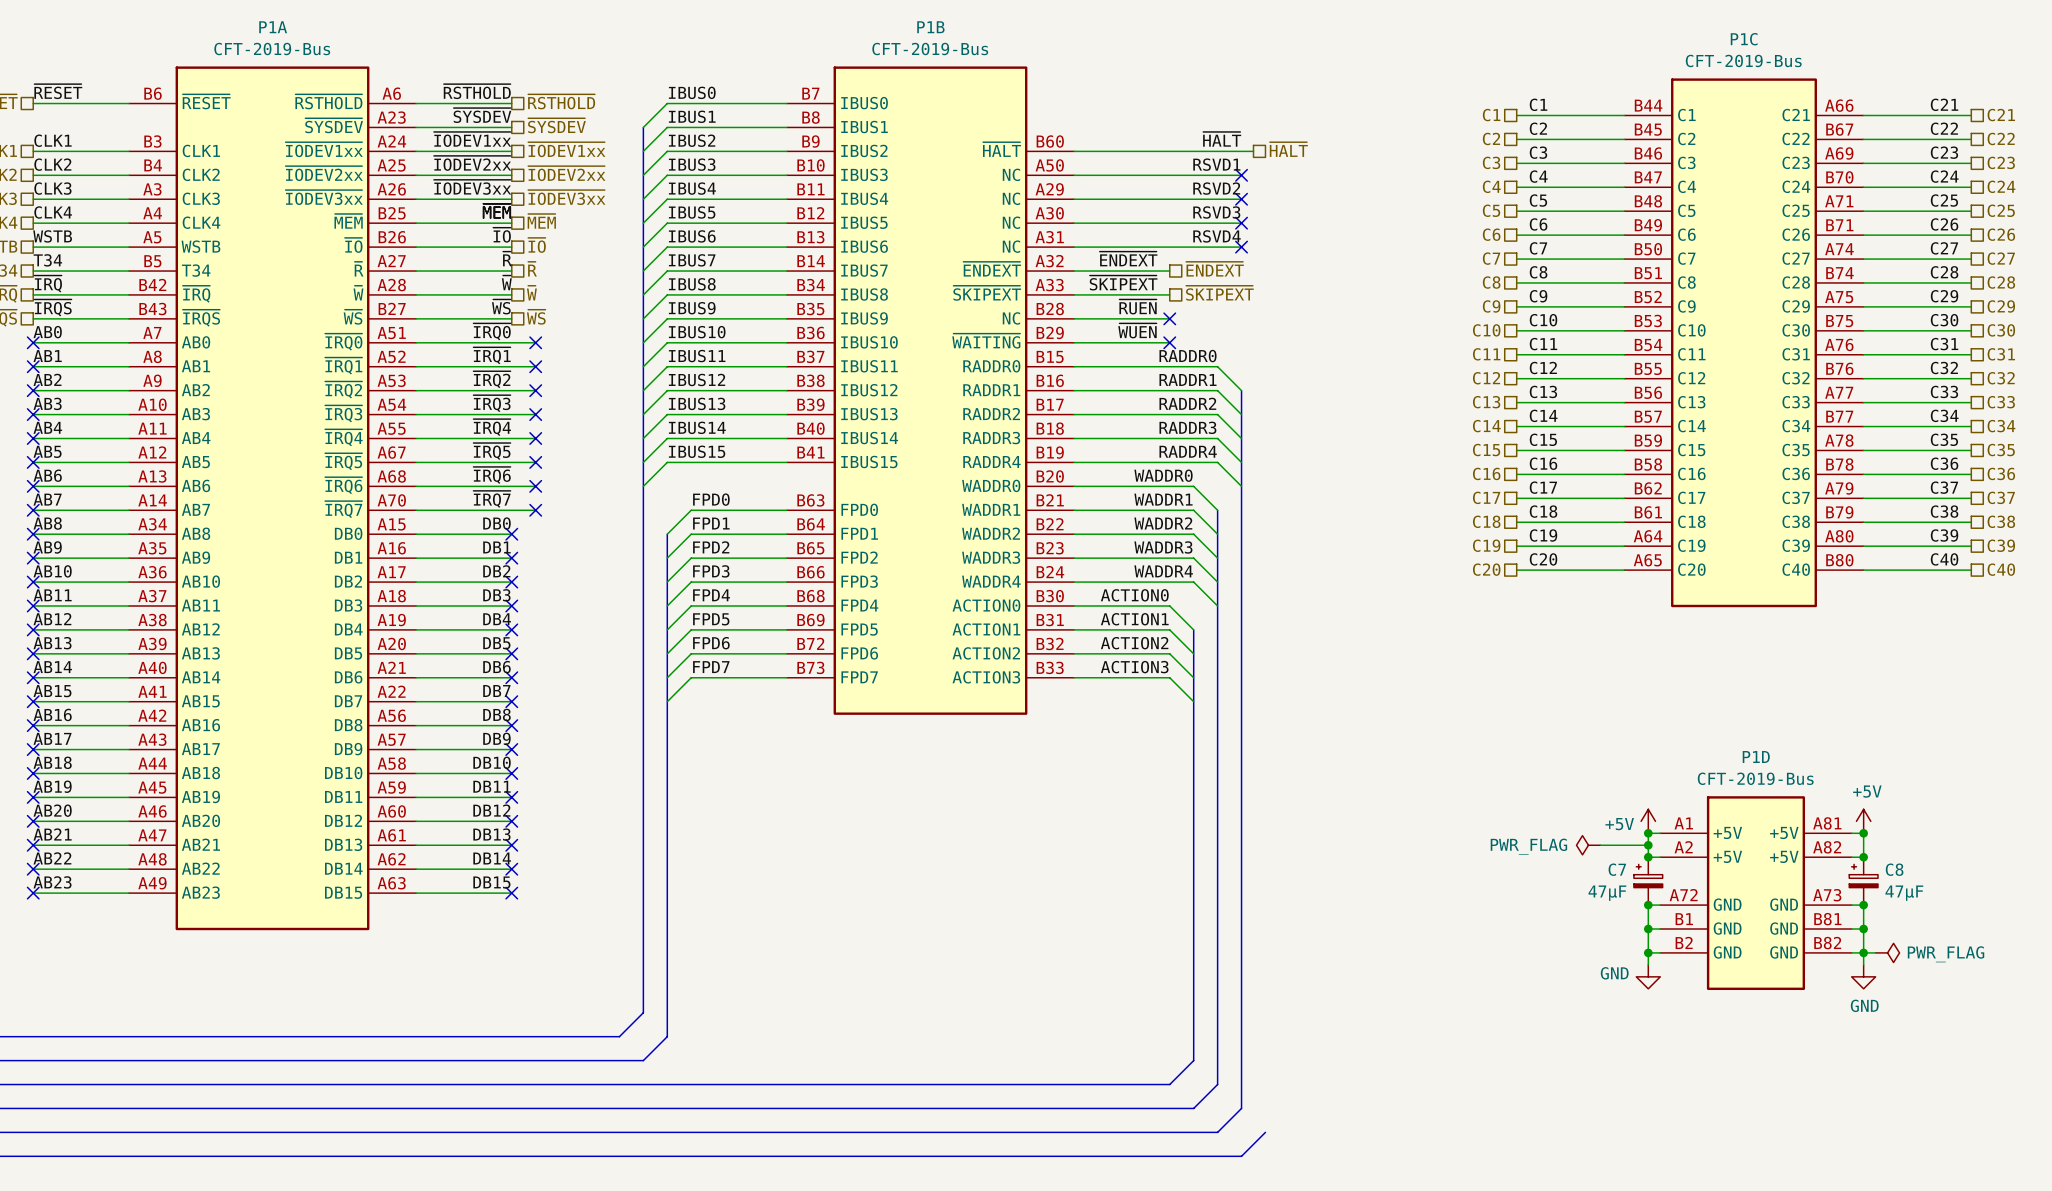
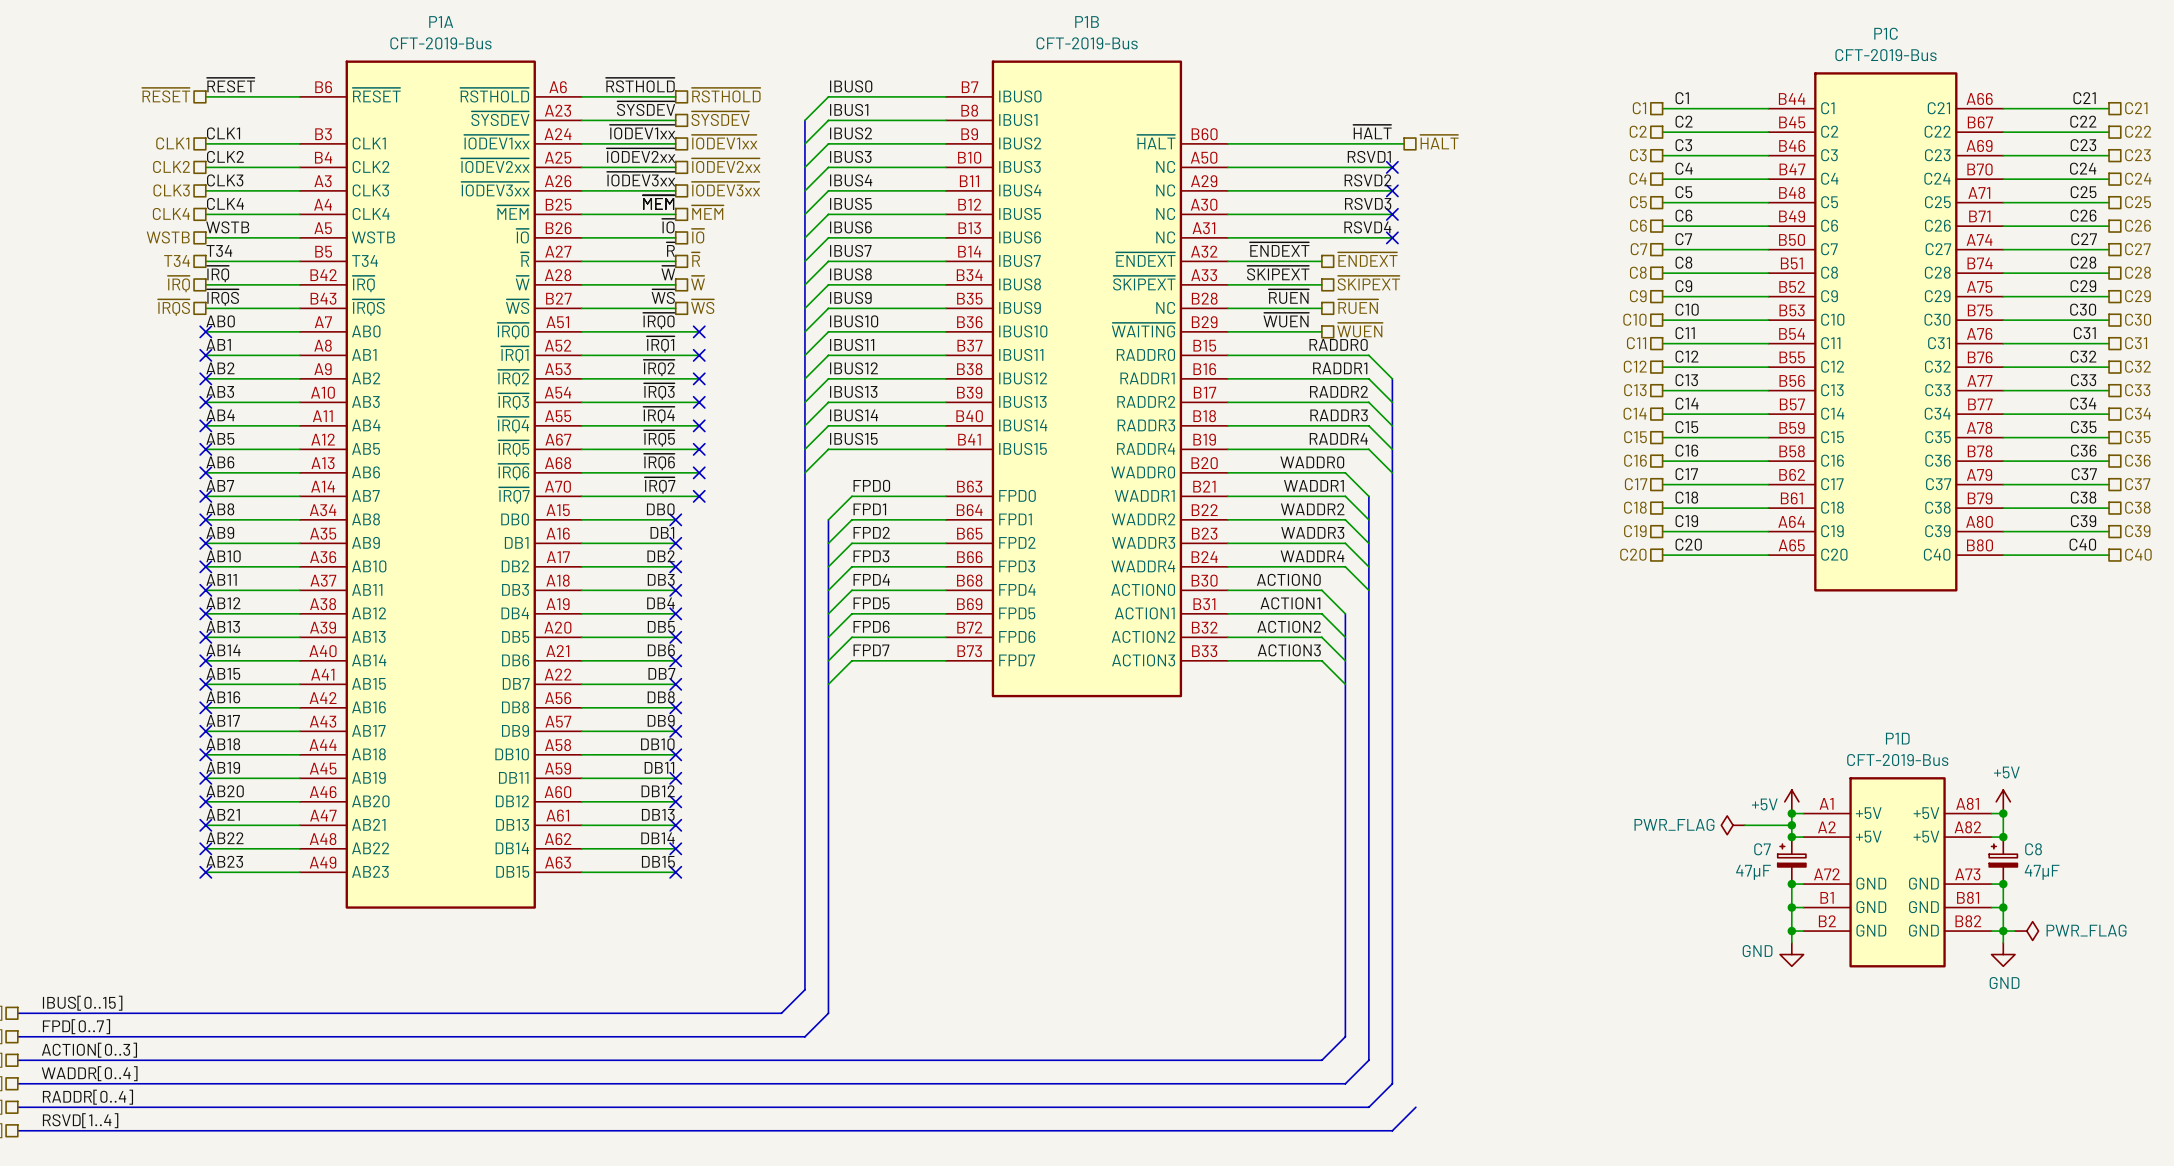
hierarchical label: none -> ~{RUEN} (1358, 306)
no-connect mark: (1169, 318) -> none
hierarchical label: none -> ~{WUEN} (1360, 330)
no-connect mark: (1169, 342) -> none

